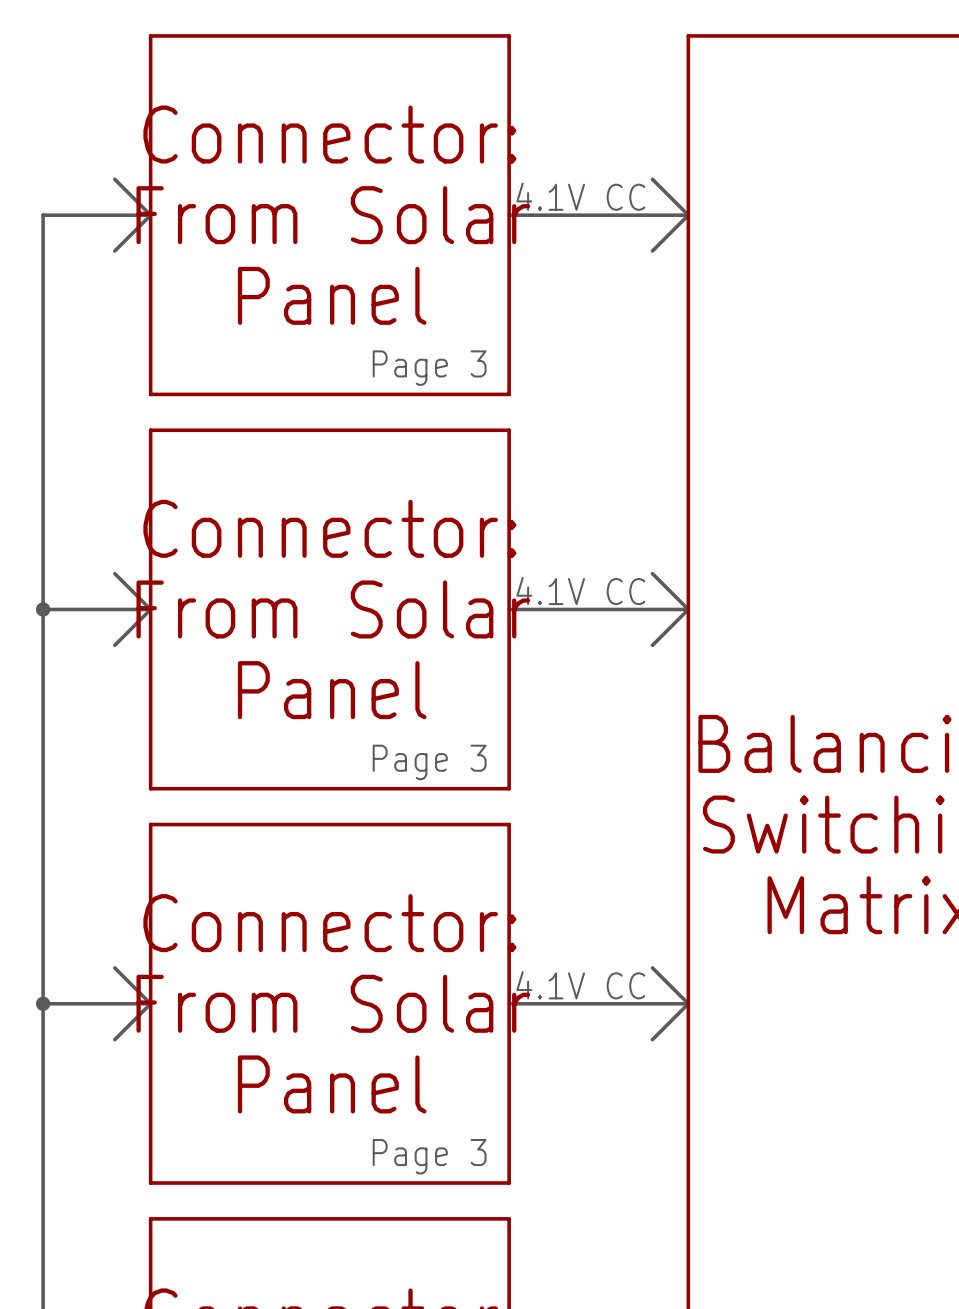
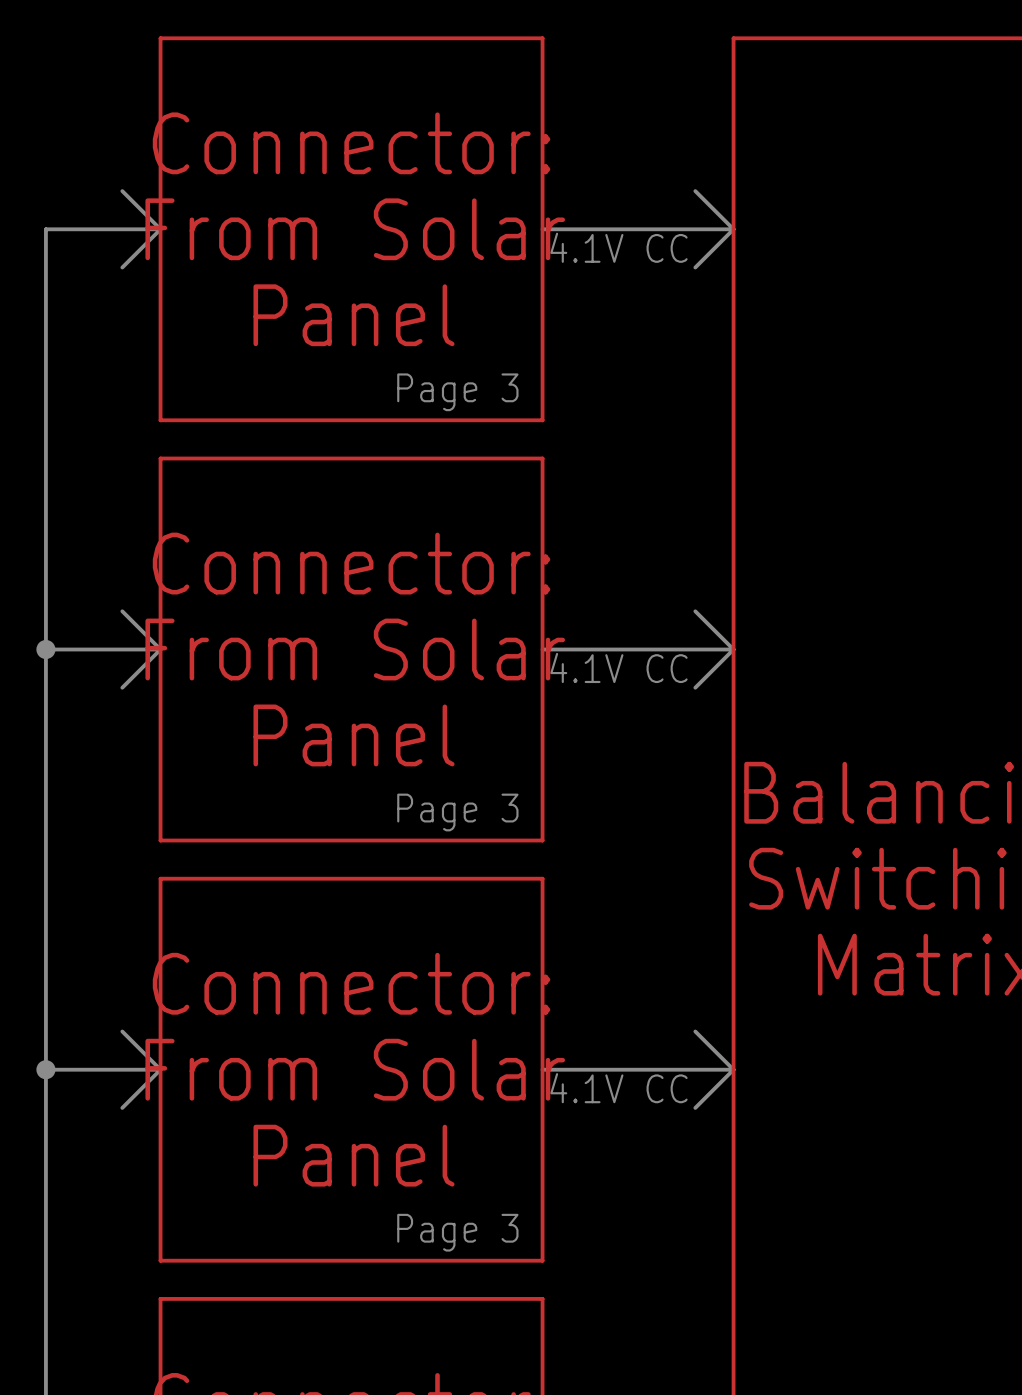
text position: 4.1V CC (580, 196) -> 4.1V CC (618, 247)
text position: 4.1V CC (580, 590) -> 4.1V CC (618, 667)
drawing: none -> [36, 639, 56, 660]
part: (43, 609) -> none
text position: 4.1V CC (580, 985) -> 4.1V CC (618, 1088)
drawing: none -> [36, 1060, 56, 1080]
part: (43, 1003) -> none

